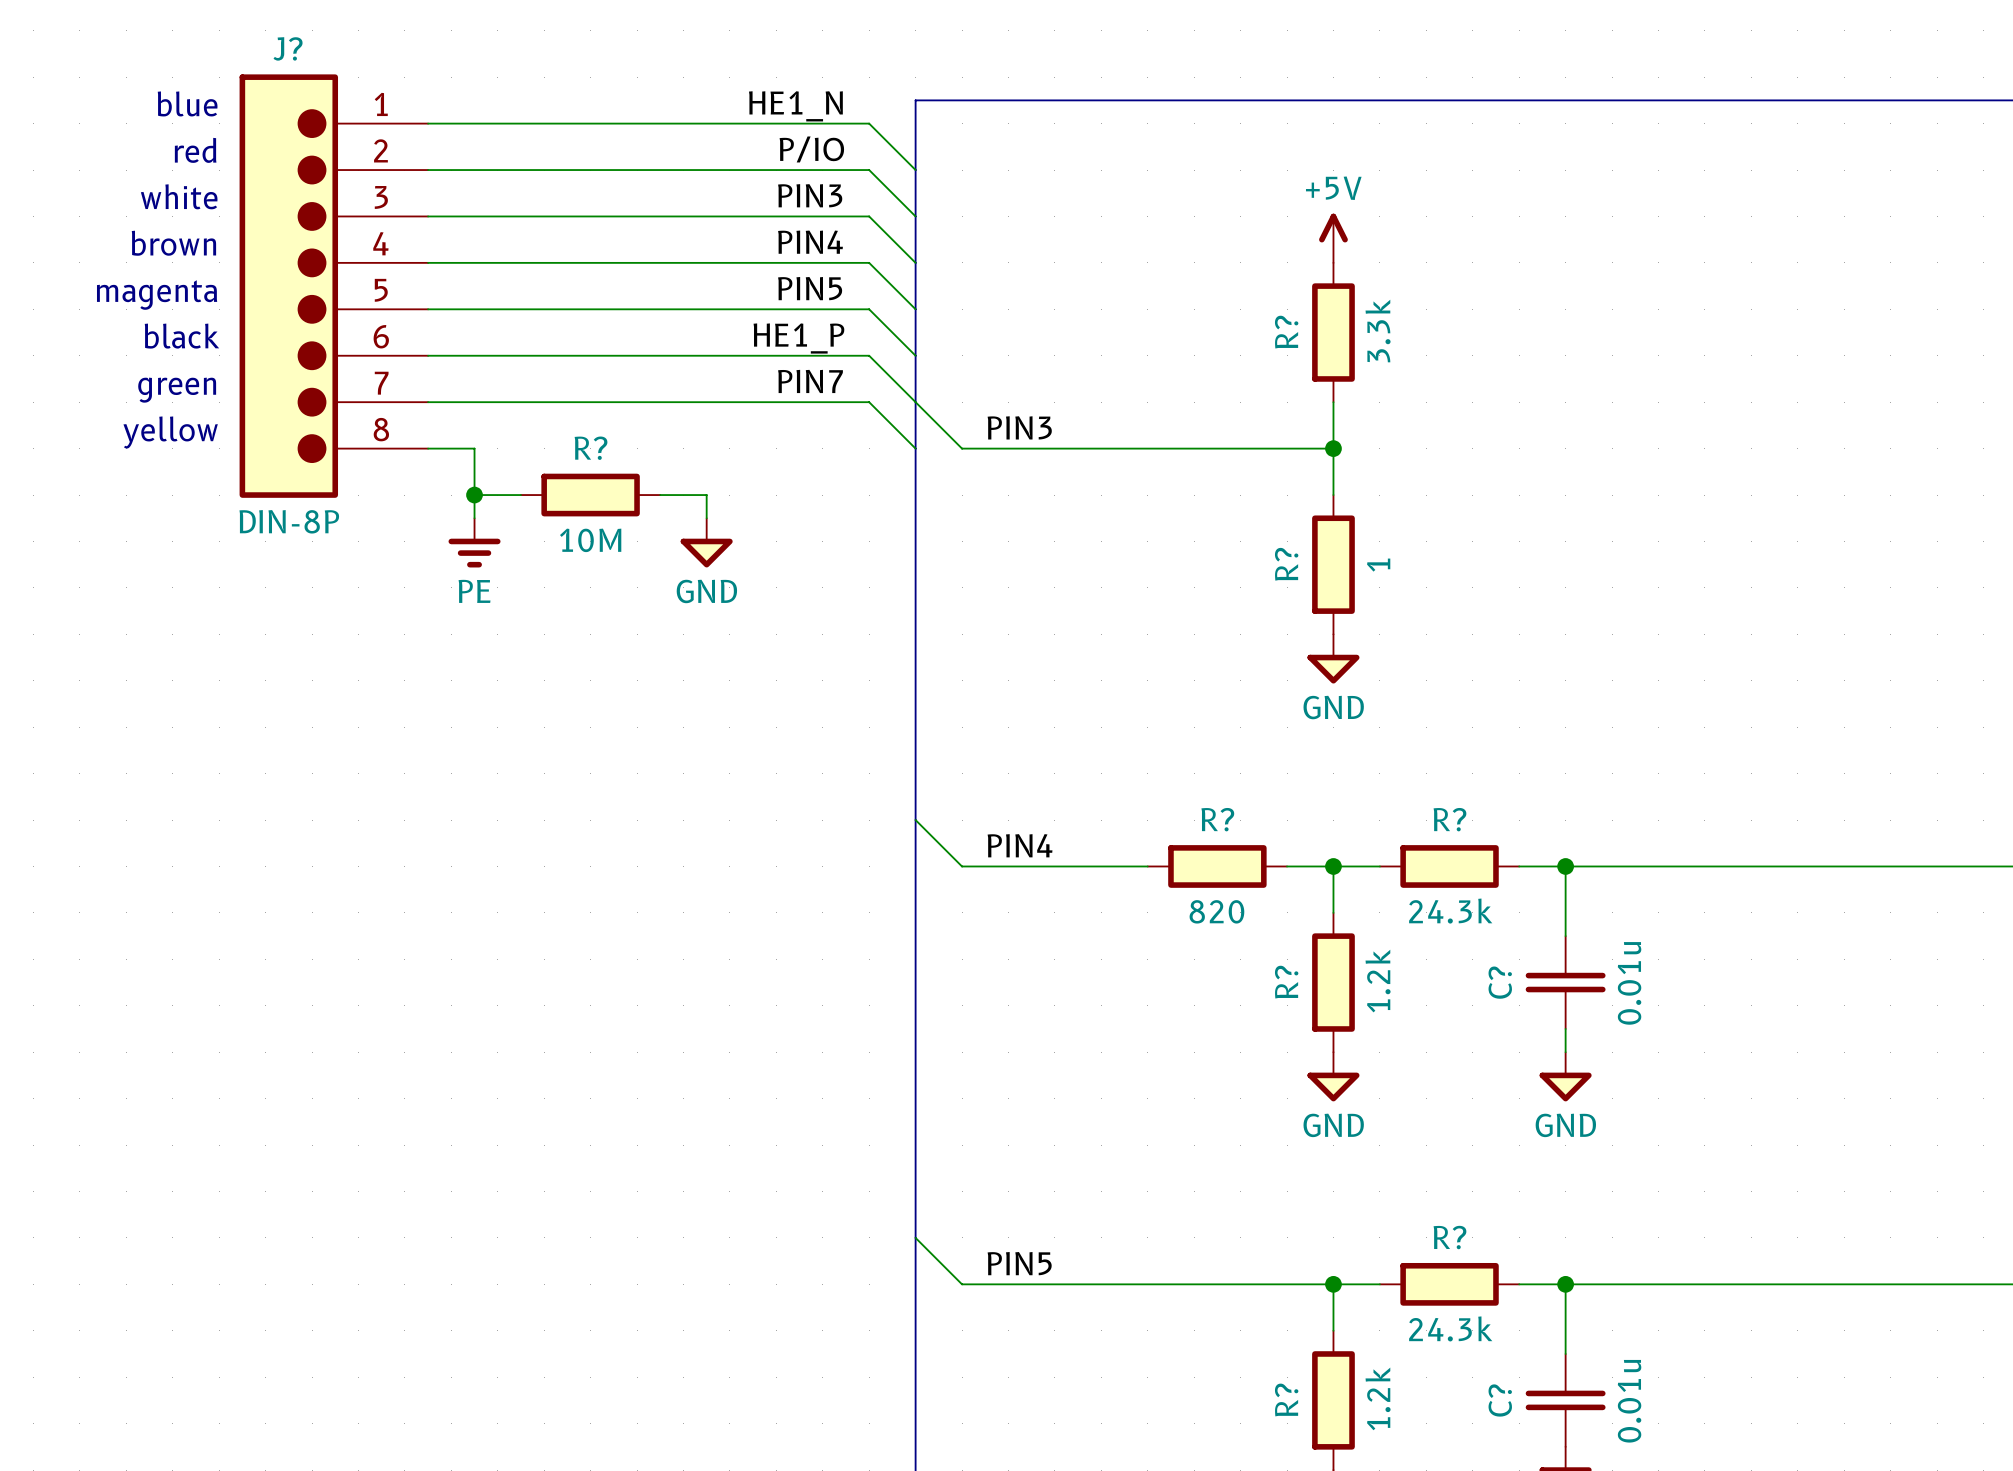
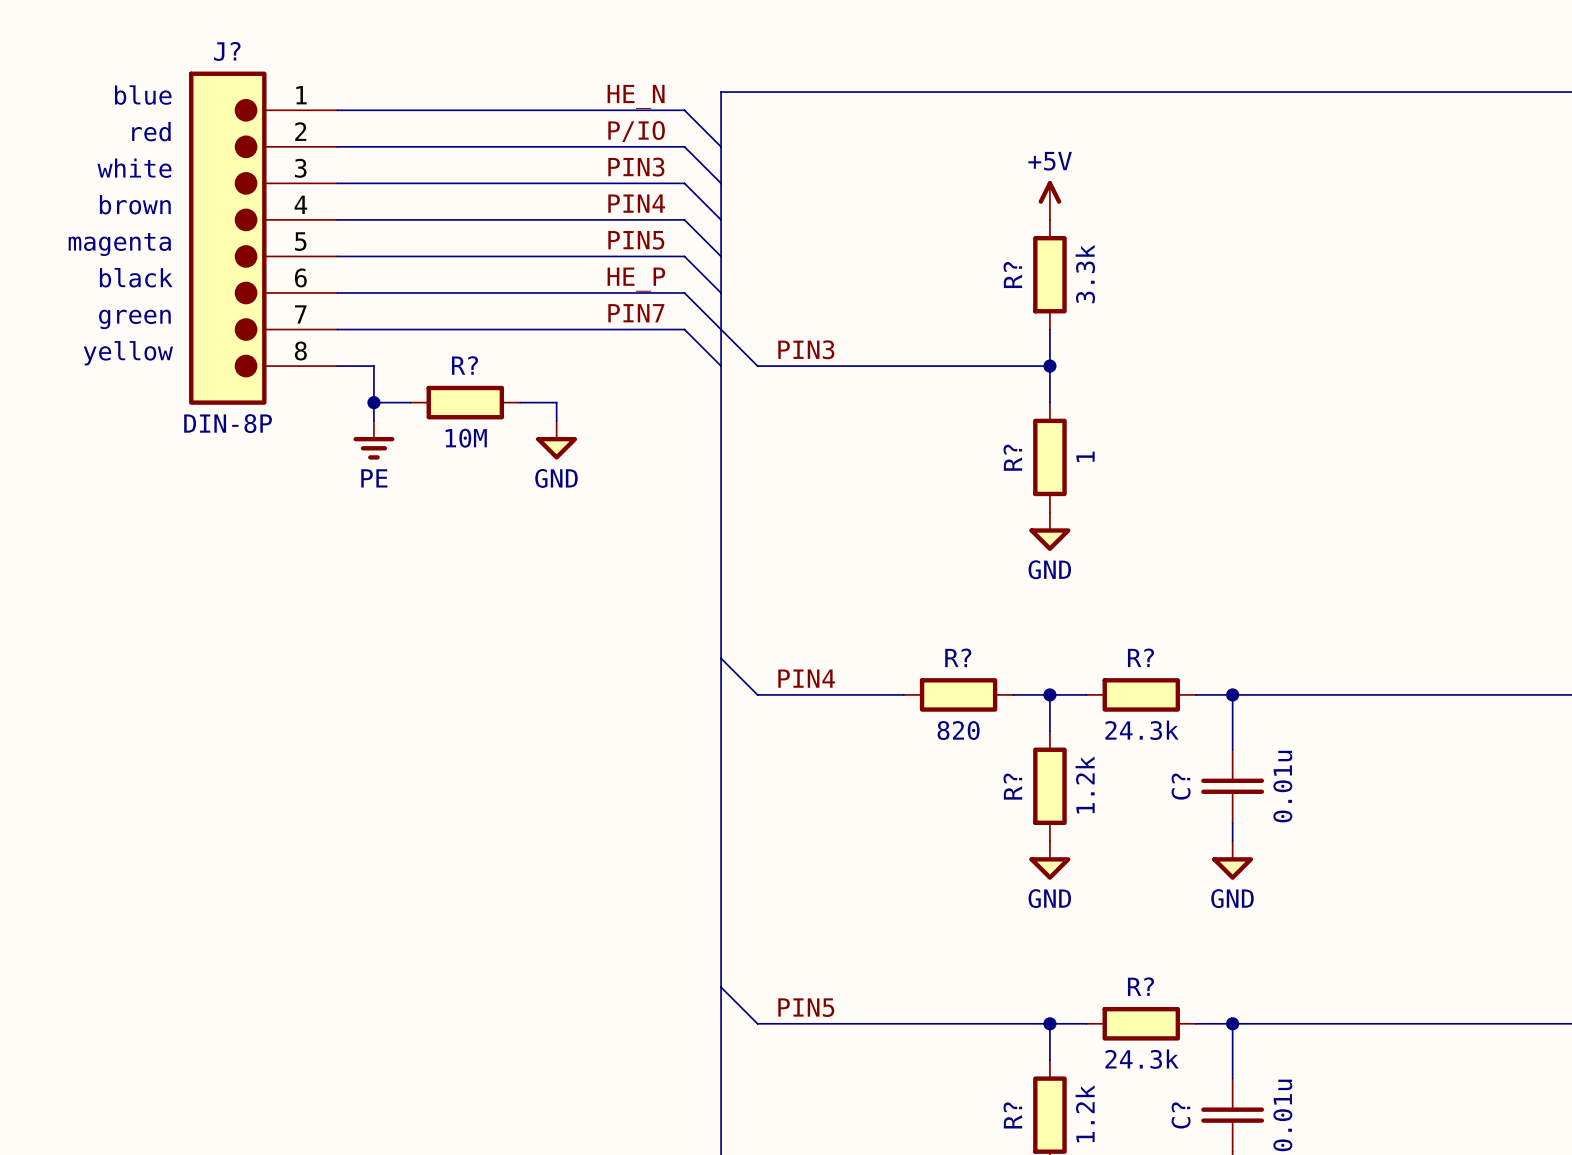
label: HE1_N (795, 106) -> HE_N (636, 96)
label: HE1_P (798, 338) -> HE_P (636, 279)

